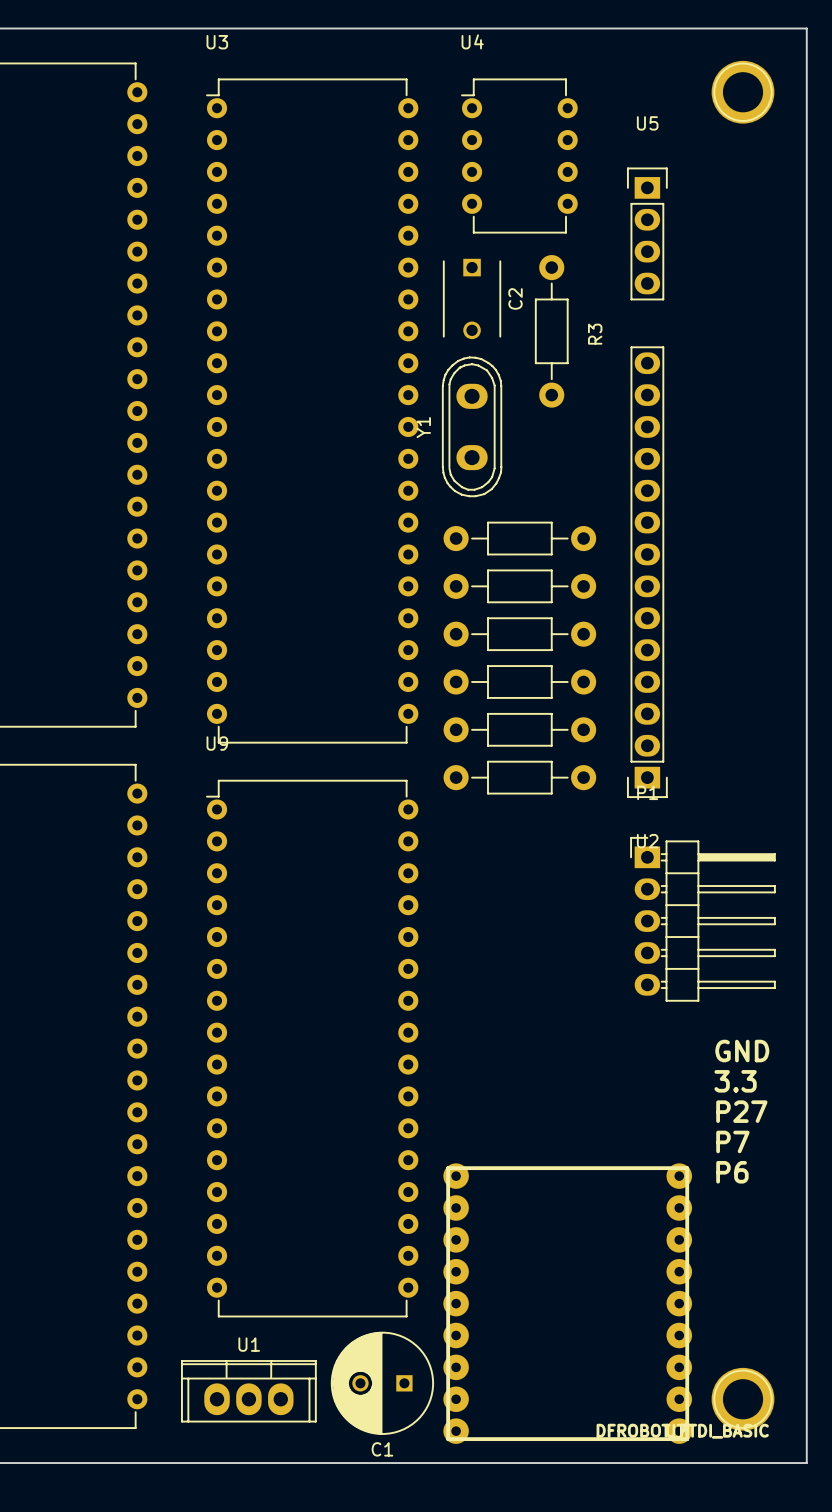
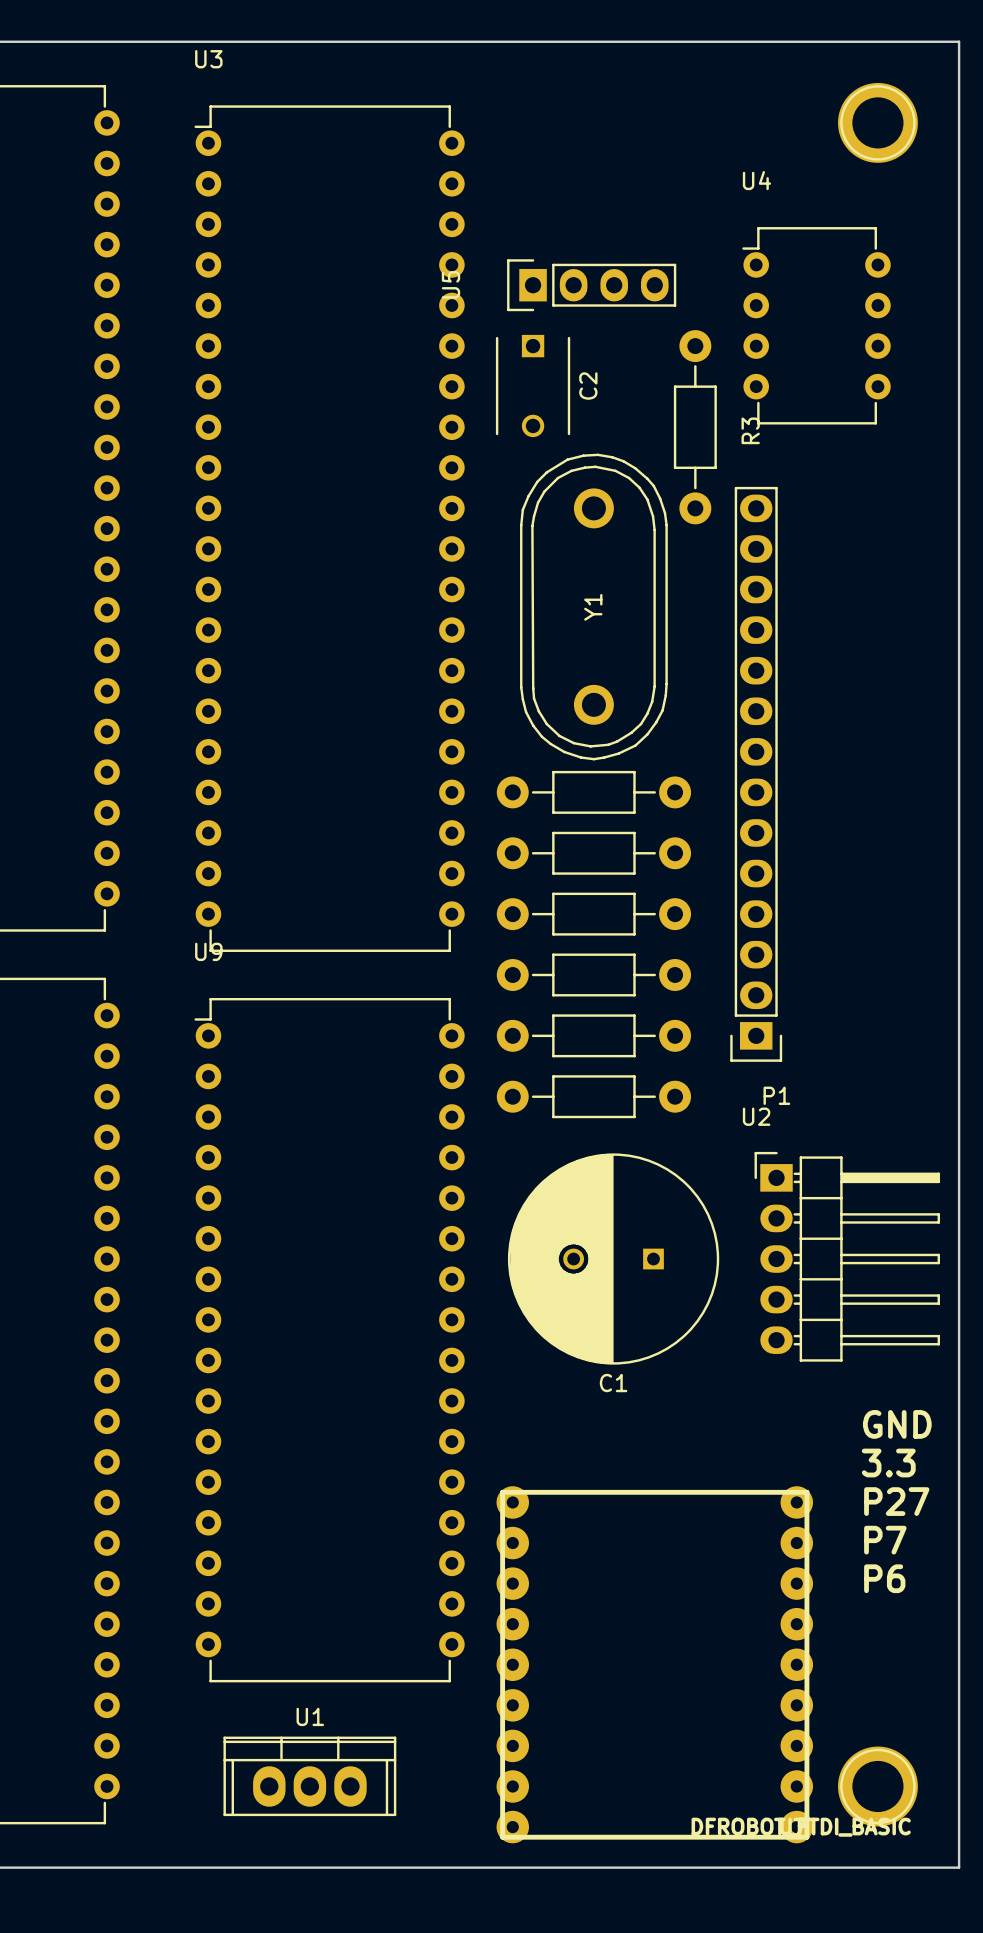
U4 position: (519, 156) -> (816, 325)
U5 rotation: 0° (647, 233) -> 90° counterclockwise (591, 285)
U5 position: (647, 233) -> (591, 285)
R3 position: (551, 331) -> (695, 427)
Y1 footprint: [441, 356, 503, 498] -> [520, 453, 668, 761]
Y1 name position: Y1 (423, 427) -> Y1 (593, 607)
part: (519, 538) -> none
U2 position: (647, 572) -> (756, 774)
part: (519, 586) -> none
part: none -> (593, 792)
part: (519, 634) -> none
part: none -> (593, 853)
part: (519, 681) -> none
part: none -> (593, 914)
part: (519, 729) -> none
part: none -> (593, 974)
part: (519, 777) -> none
part: none -> (593, 1035)
part: none -> (593, 1096)
P1 position: (702, 919) -> (847, 1256)
text position: GND (742, 1051) -> GND (897, 1424)
text position: 3.3 (735, 1081) -> 3.3 (888, 1462)
text position: P27 (741, 1111) -> P27 (896, 1501)
text position: P7 (732, 1141) -> P7 (885, 1540)
text position: P6 (732, 1172) -> P6 (884, 1578)
C1 footprint: [330, 1331, 435, 1435] -> [507, 1153, 720, 1365]
U1 position: (248, 1391) -> (309, 1776)
C1 name position: C1 (382, 1449) -> C1 (613, 1383)

